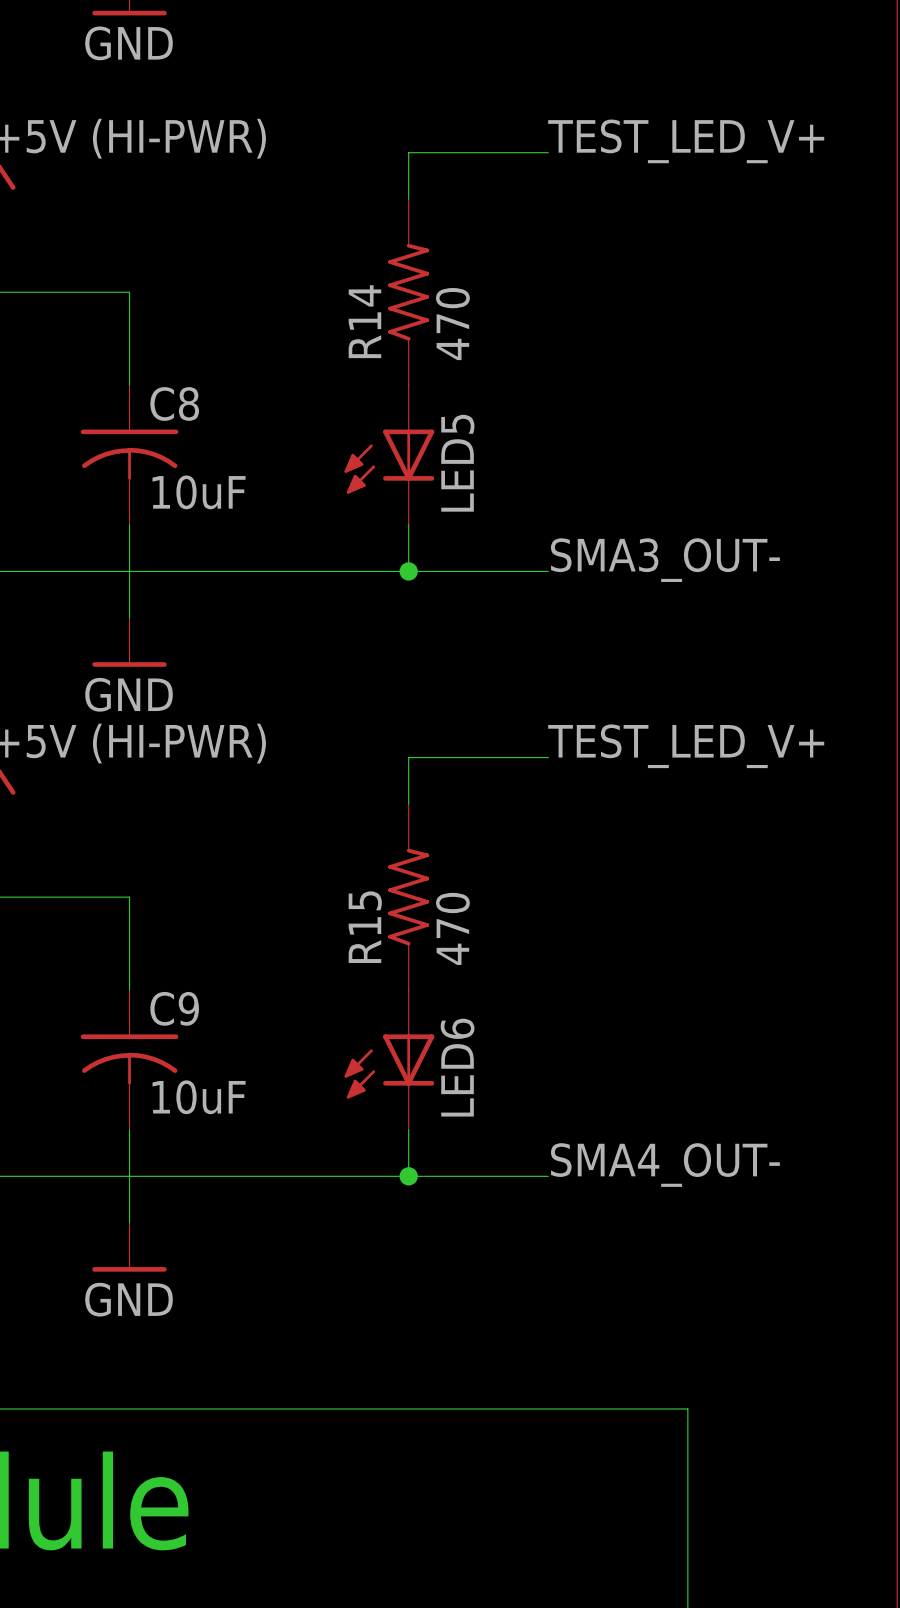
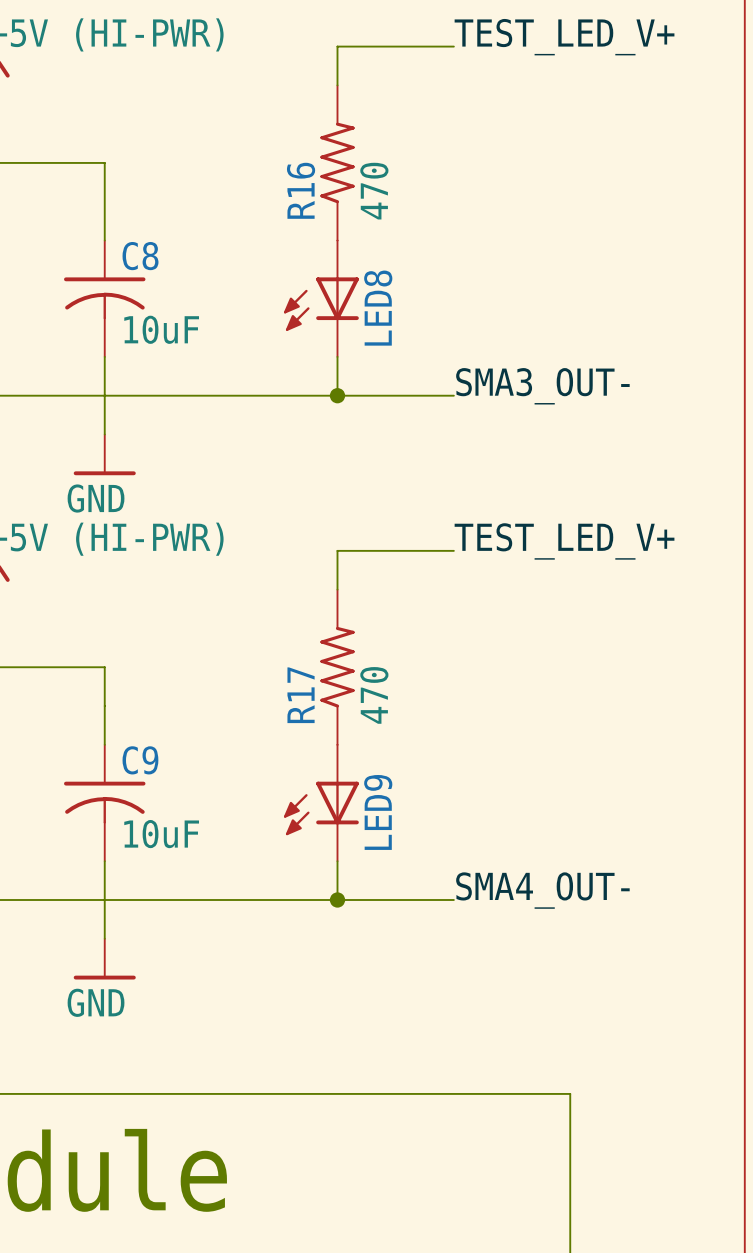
R14 name: R14 (364, 321) -> R16 (301, 190)
LED5 name: LED5 (457, 463) -> LED8 (378, 308)
R15 name: R15 (365, 927) -> R17 (301, 695)
LED6 name: LED6 (457, 1067) -> LED9 (378, 812)

